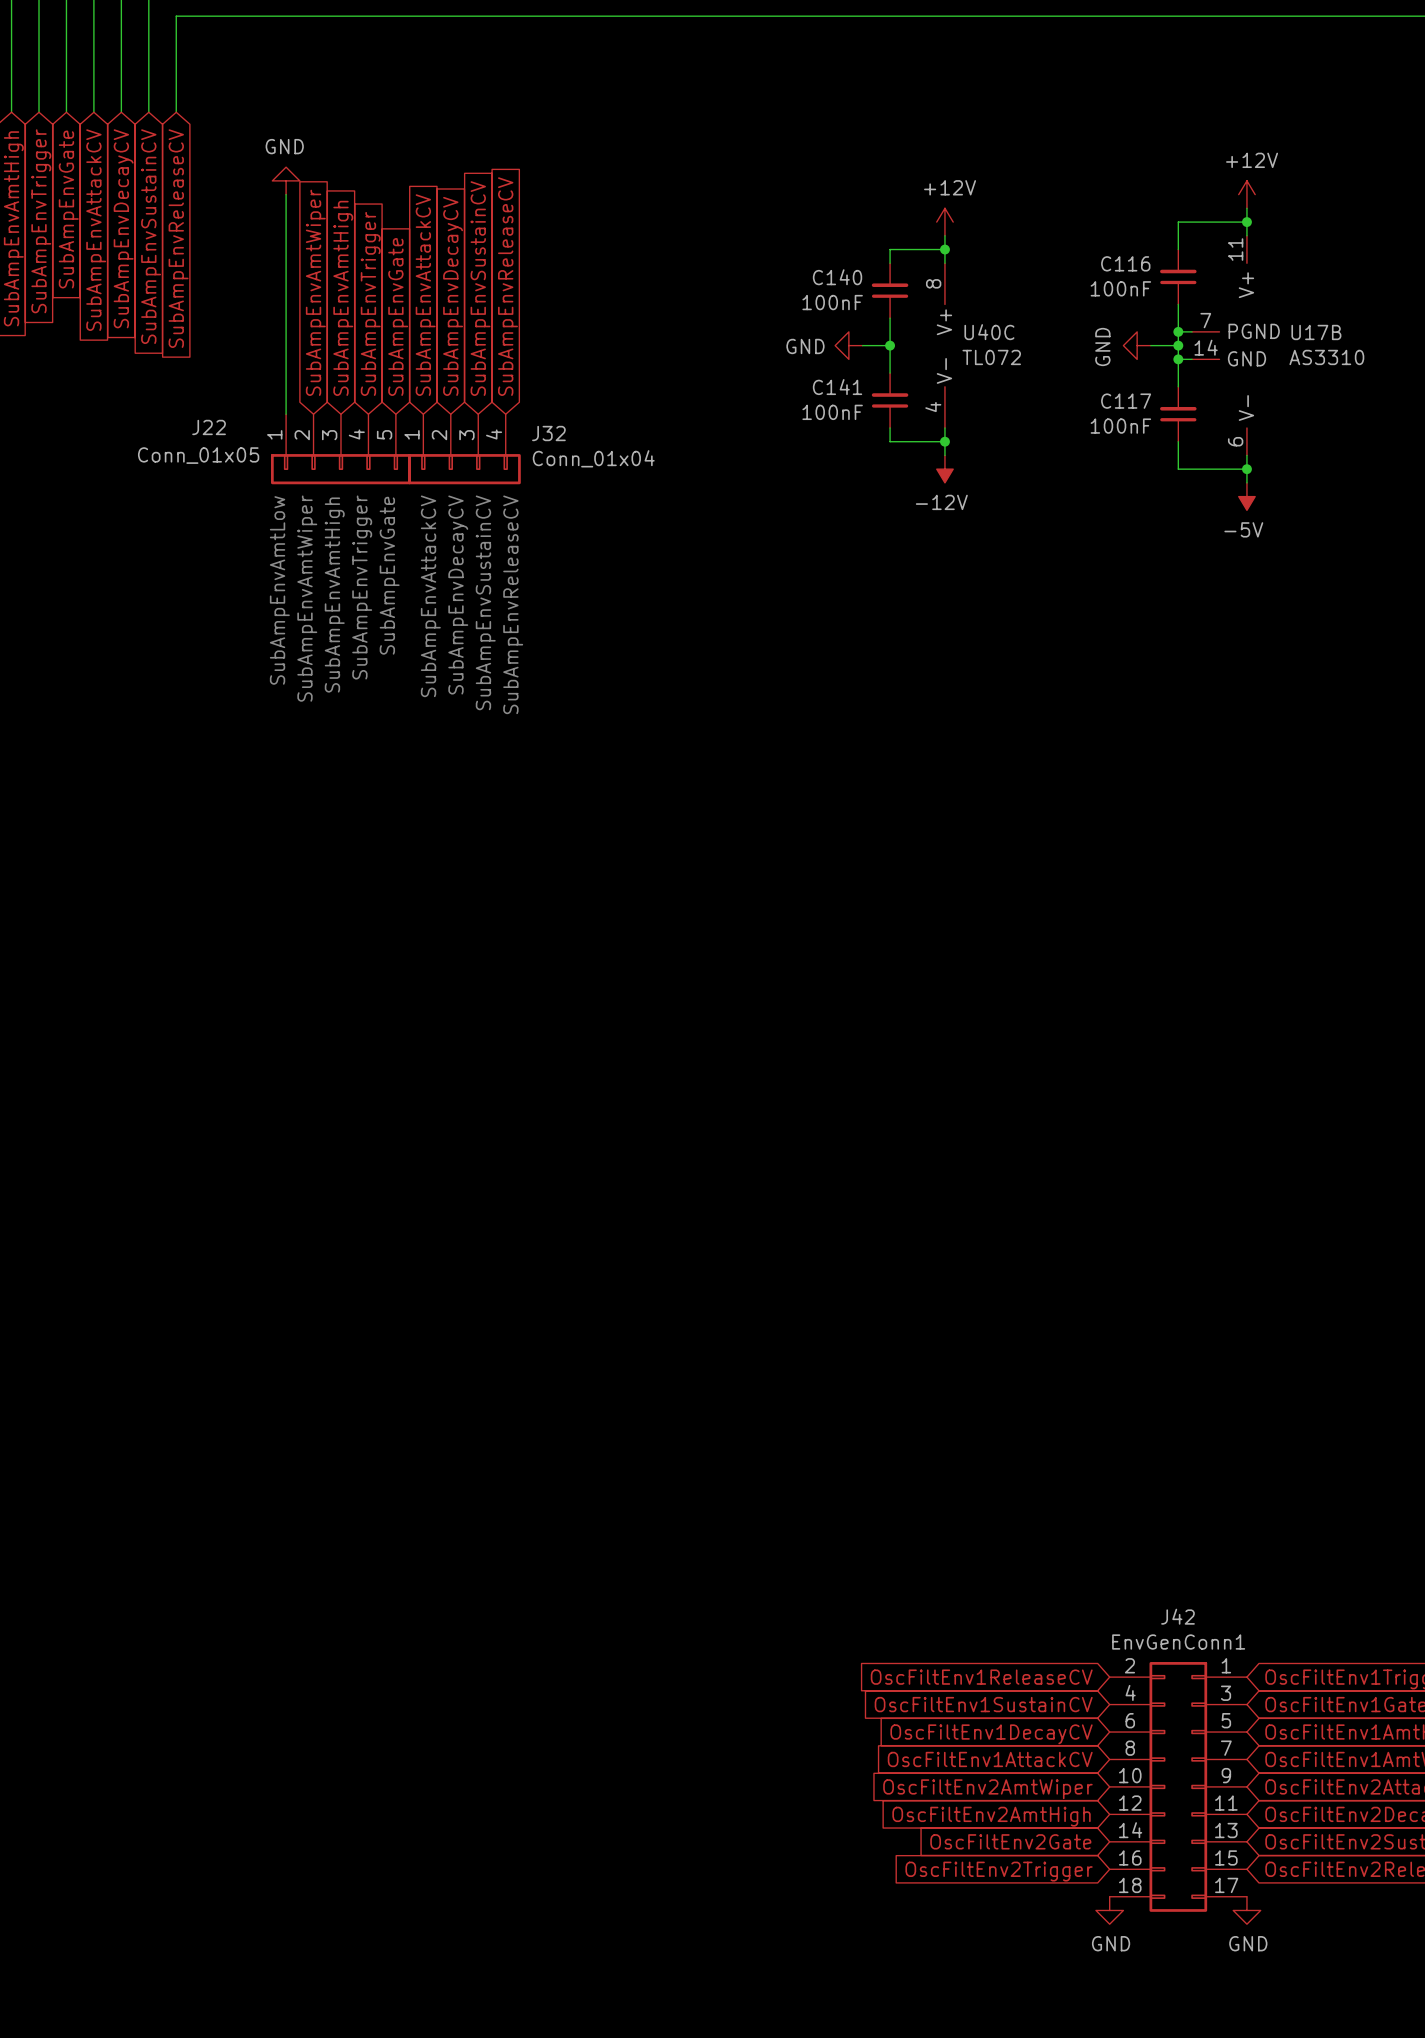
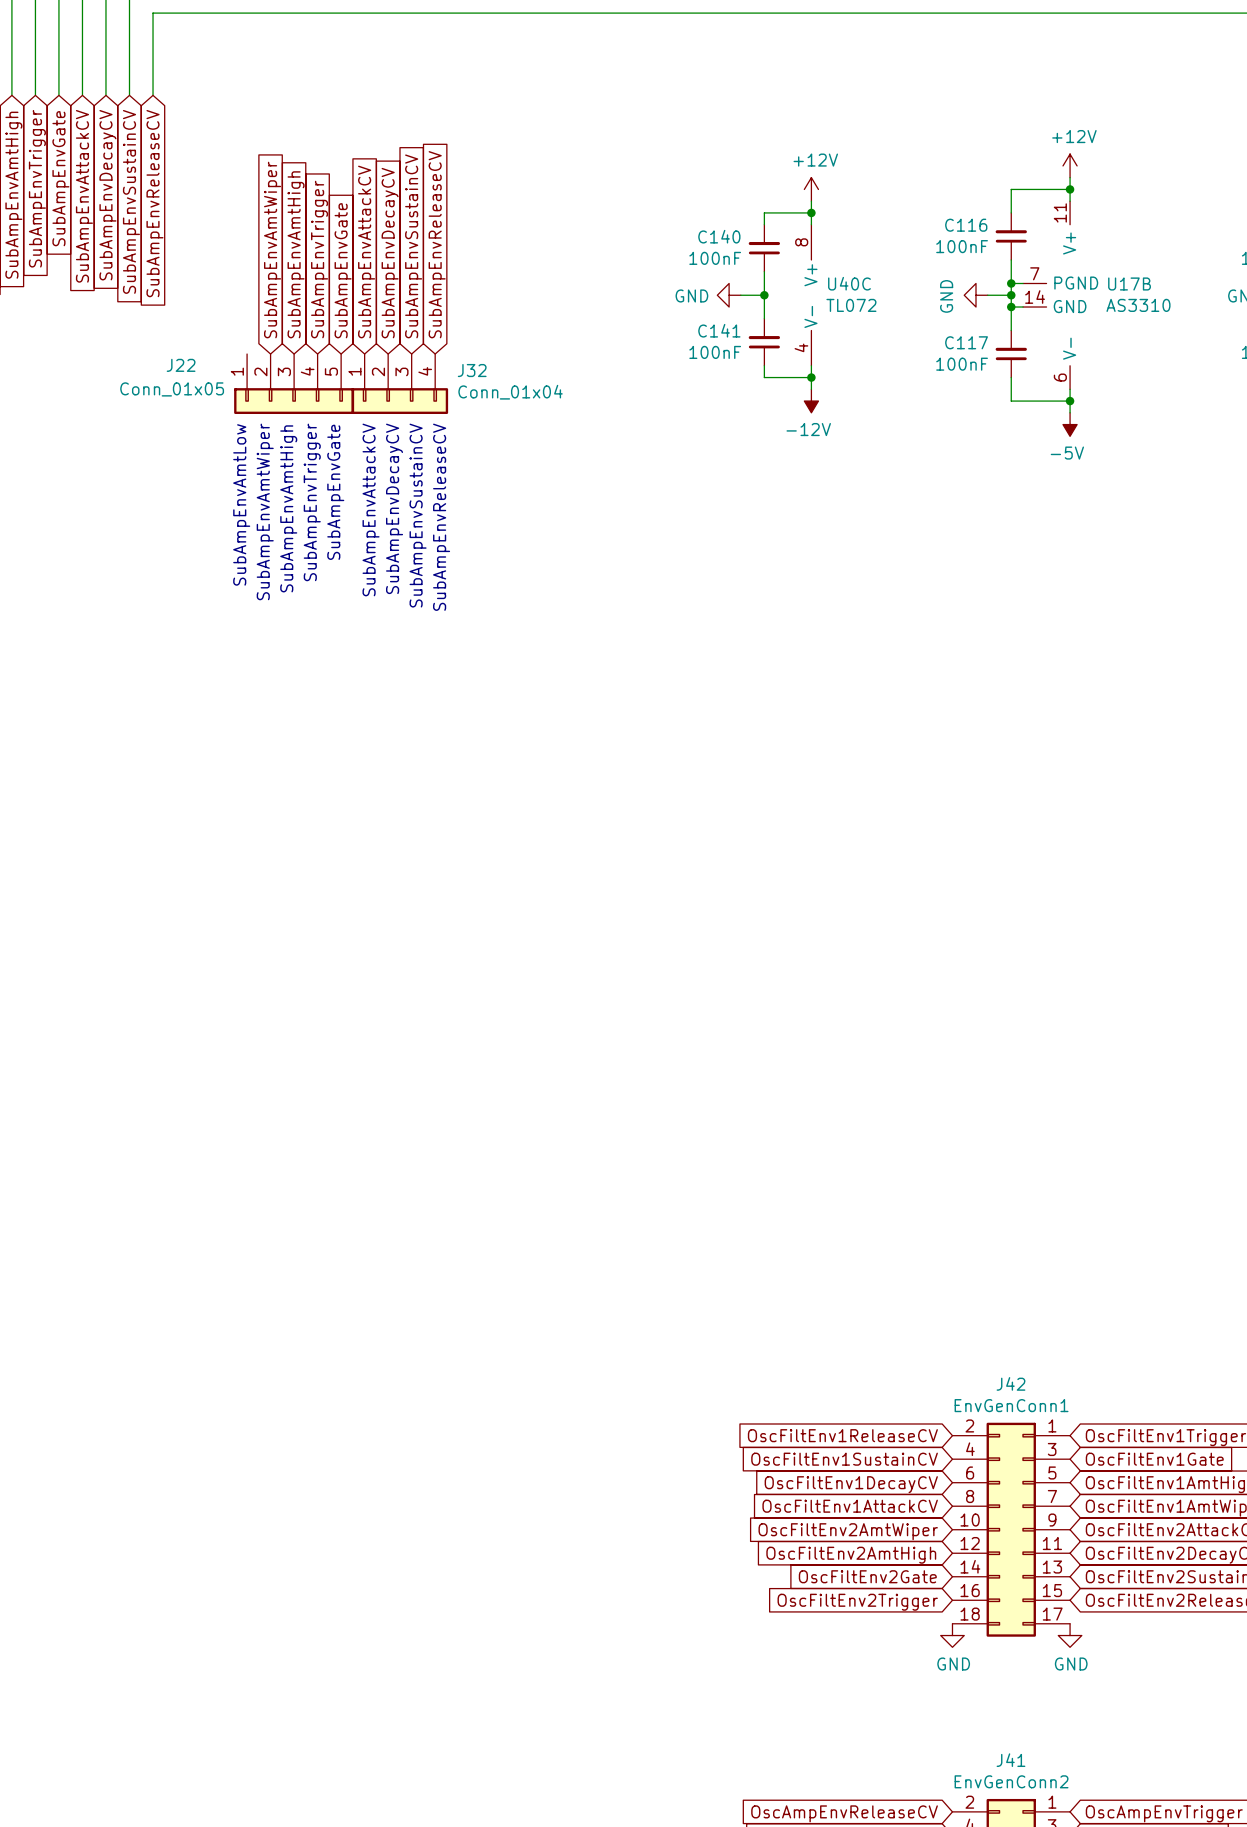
power symbol: GND (286, 180) -> none
wire: (286, 194) (286, 414) -> none

